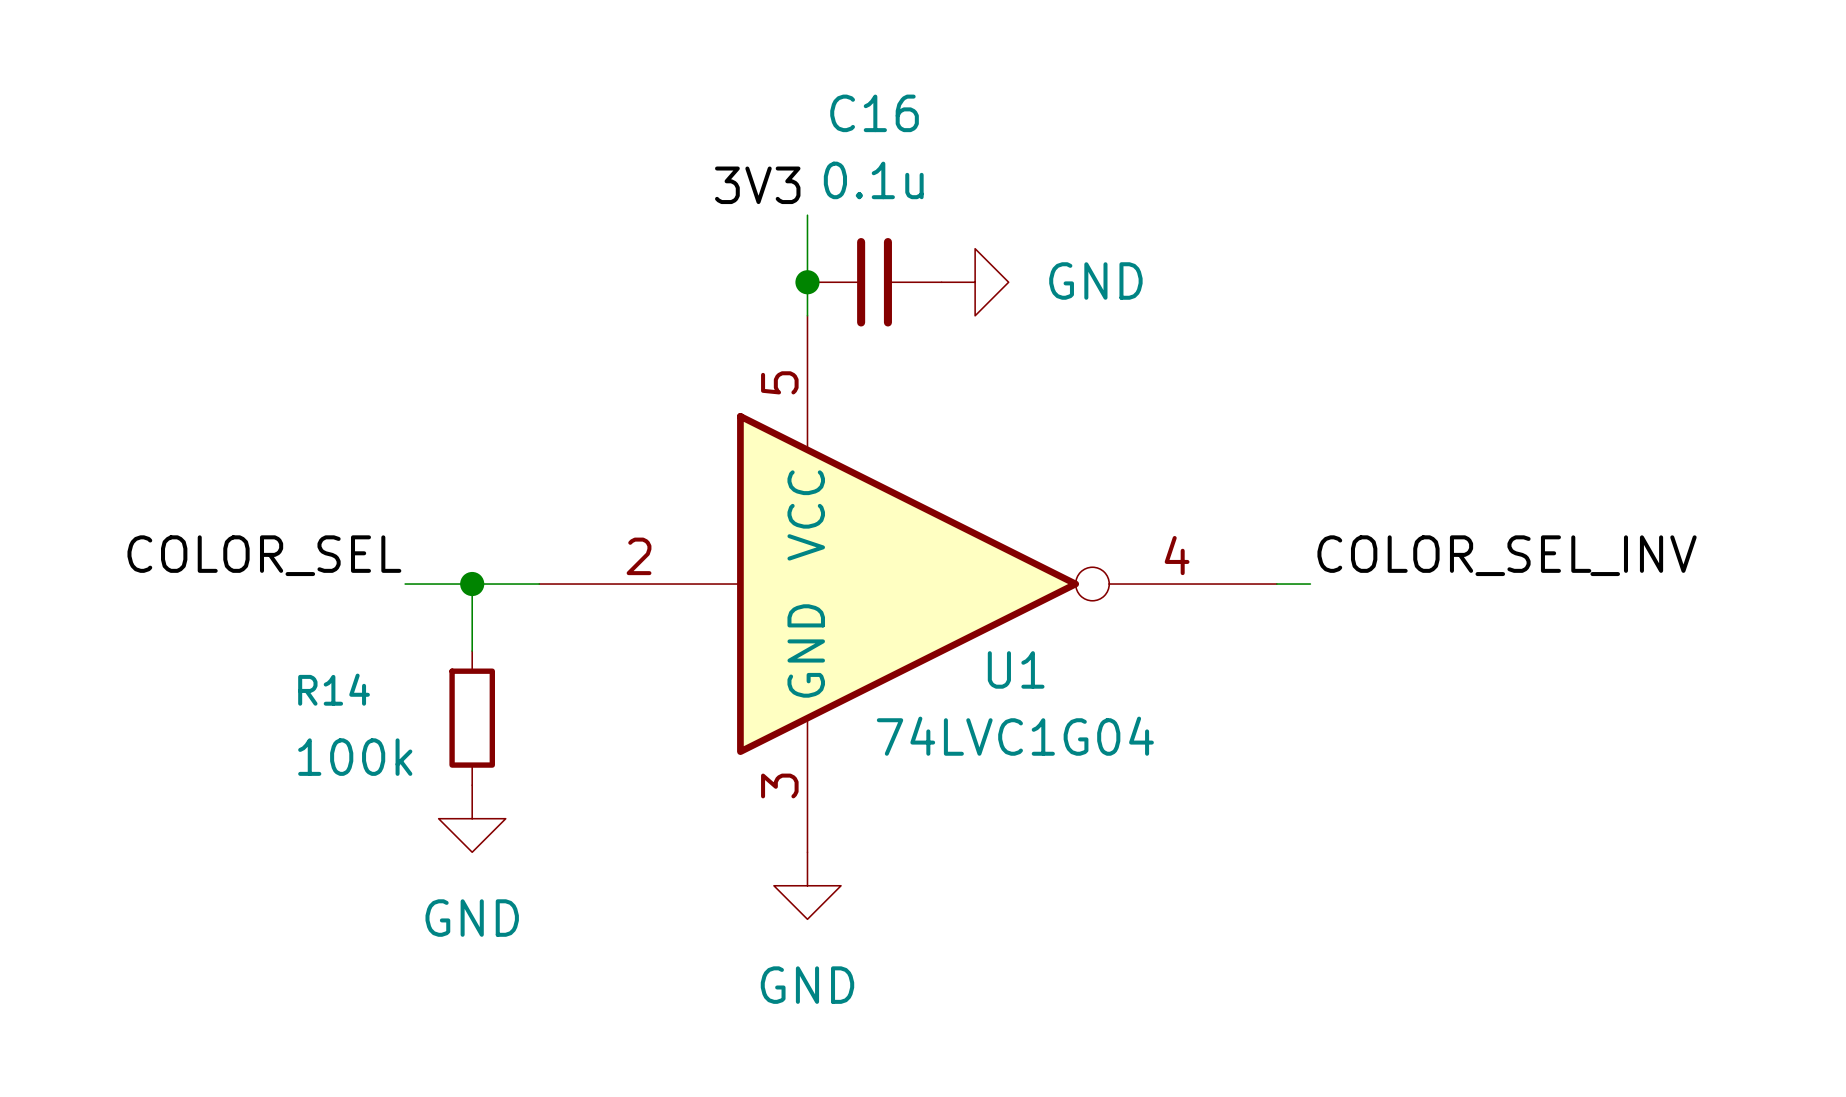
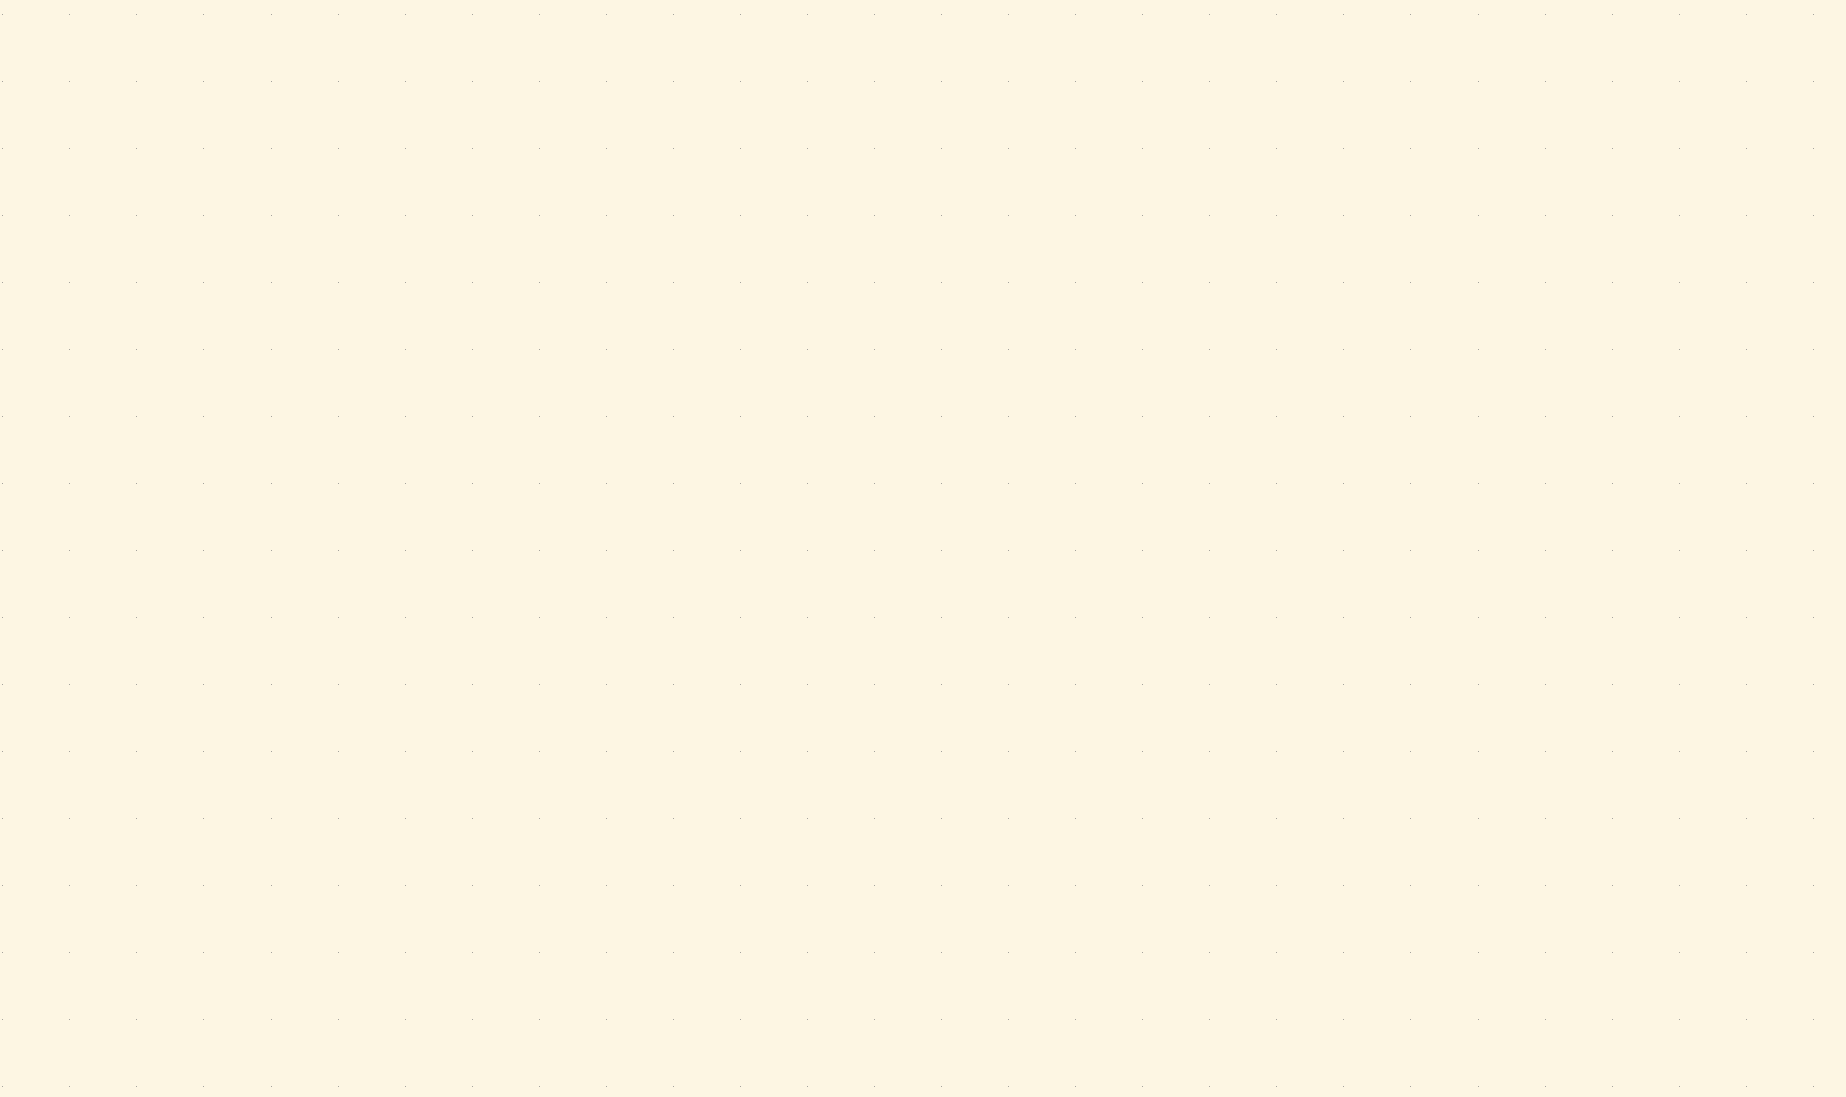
label: 3V3 (757, 185) -> none
wire: (807, 215) (807, 315) -> none
junction: (807, 282) -> none
C16: 0.1u (874, 282) -> none
power symbol: GND (975, 282) -> none
label: COLOR_SEL (264, 555) -> none
label: COLOR_SEL_INV (1507, 555) -> none
wire: (405, 584) (539, 584) -> none
wire: (472, 584) (472, 651) -> none
junction: (472, 584) -> none
U1: 74LVC1G04 (908, 584) -> none
wire: (1276, 584) (1310, 584) -> none
R14: 100k (472, 718) -> none
power symbol: GND (472, 818) -> none
power symbol: GND (807, 885) -> none

